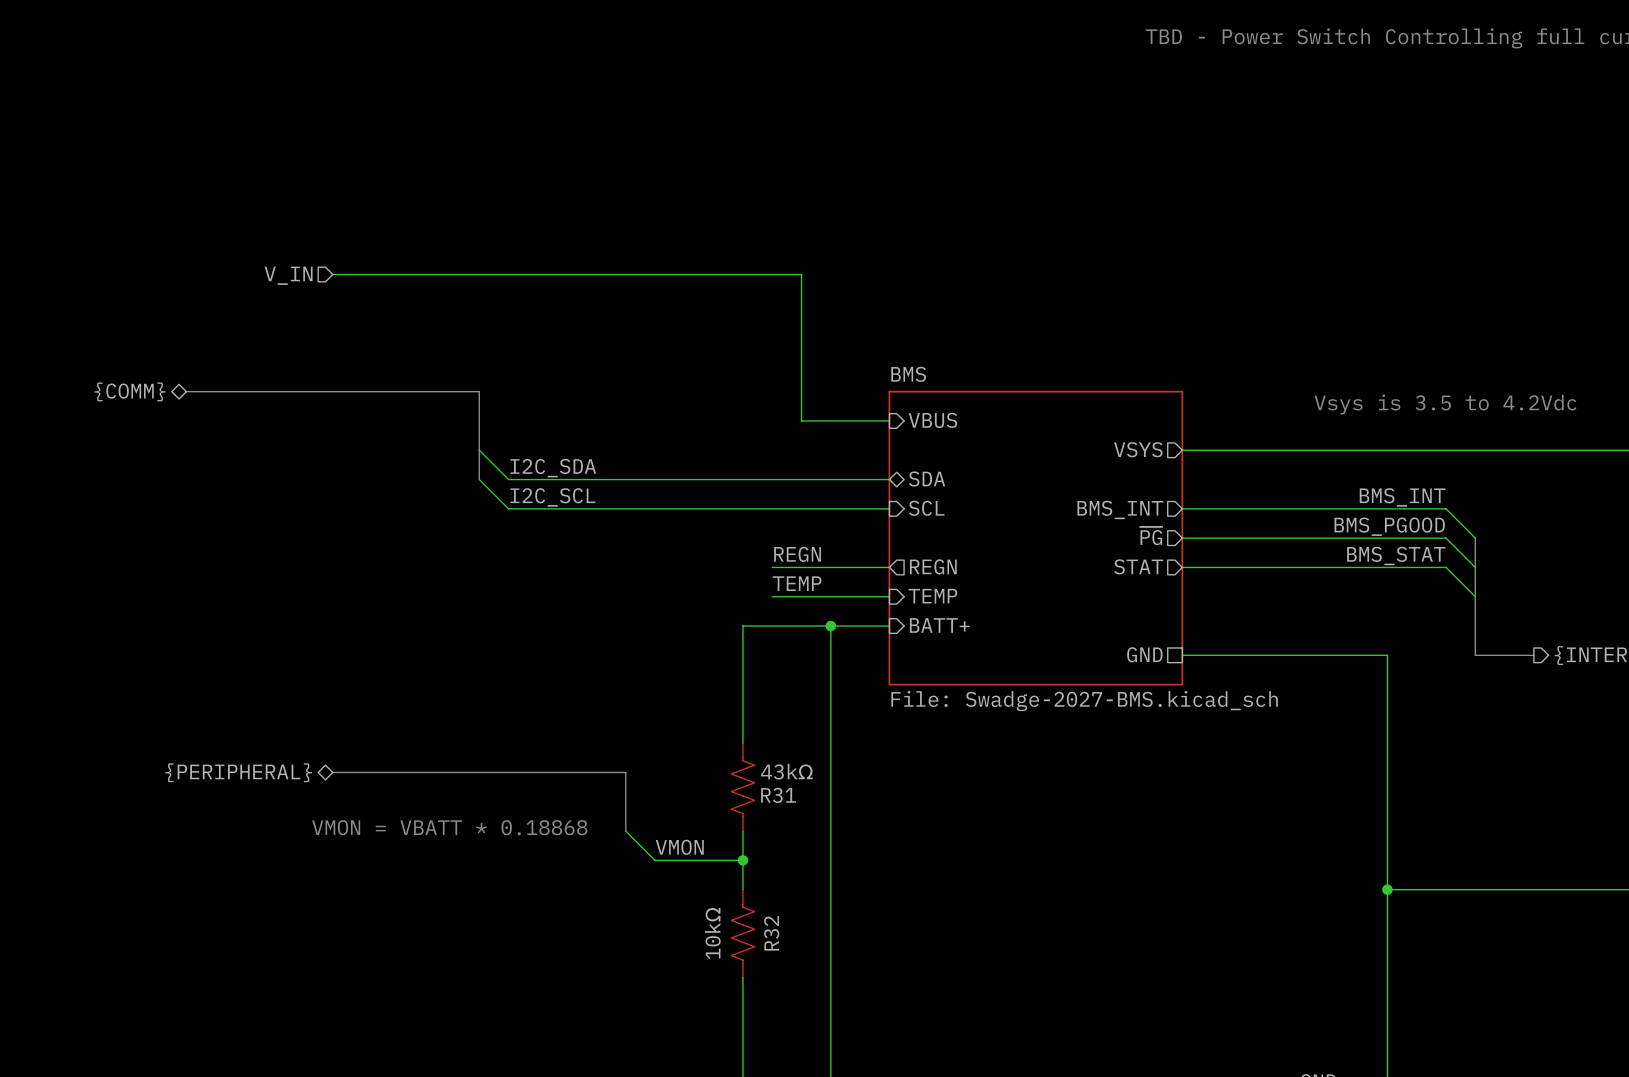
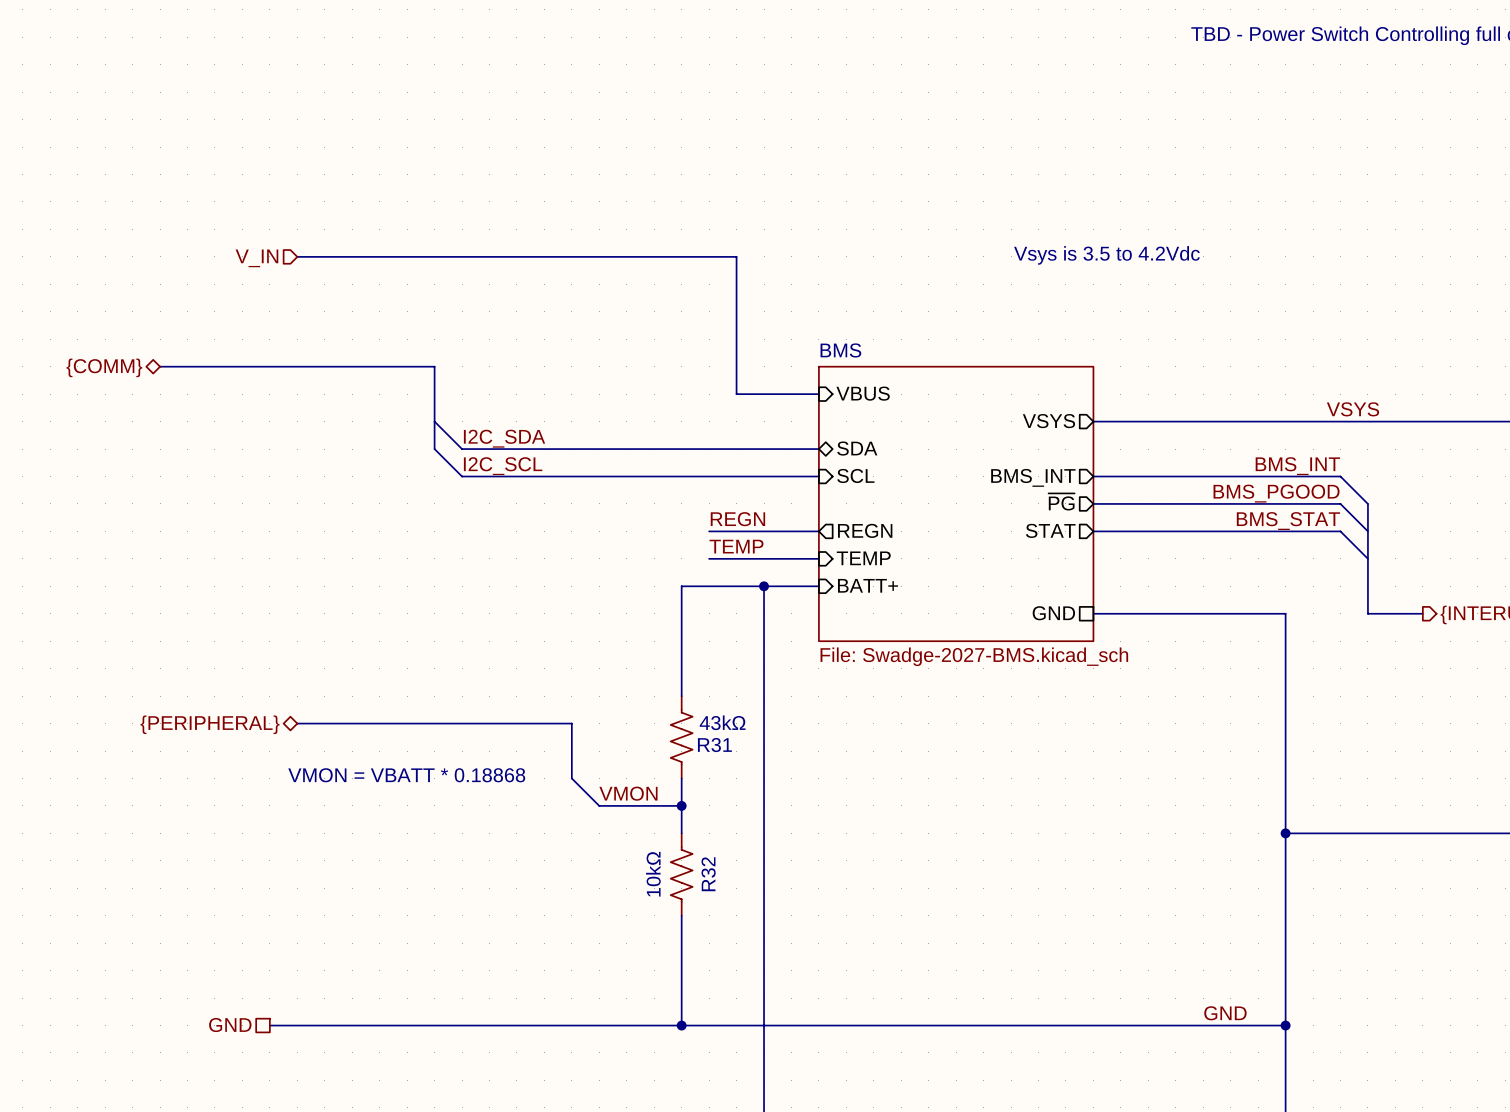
text position: Vsys is 3.5 to 4.2Vdc (1445, 404) -> Vsys is 3.5 to 4.2Vdc (1106, 255)
label: none -> VSYS (1352, 409)

